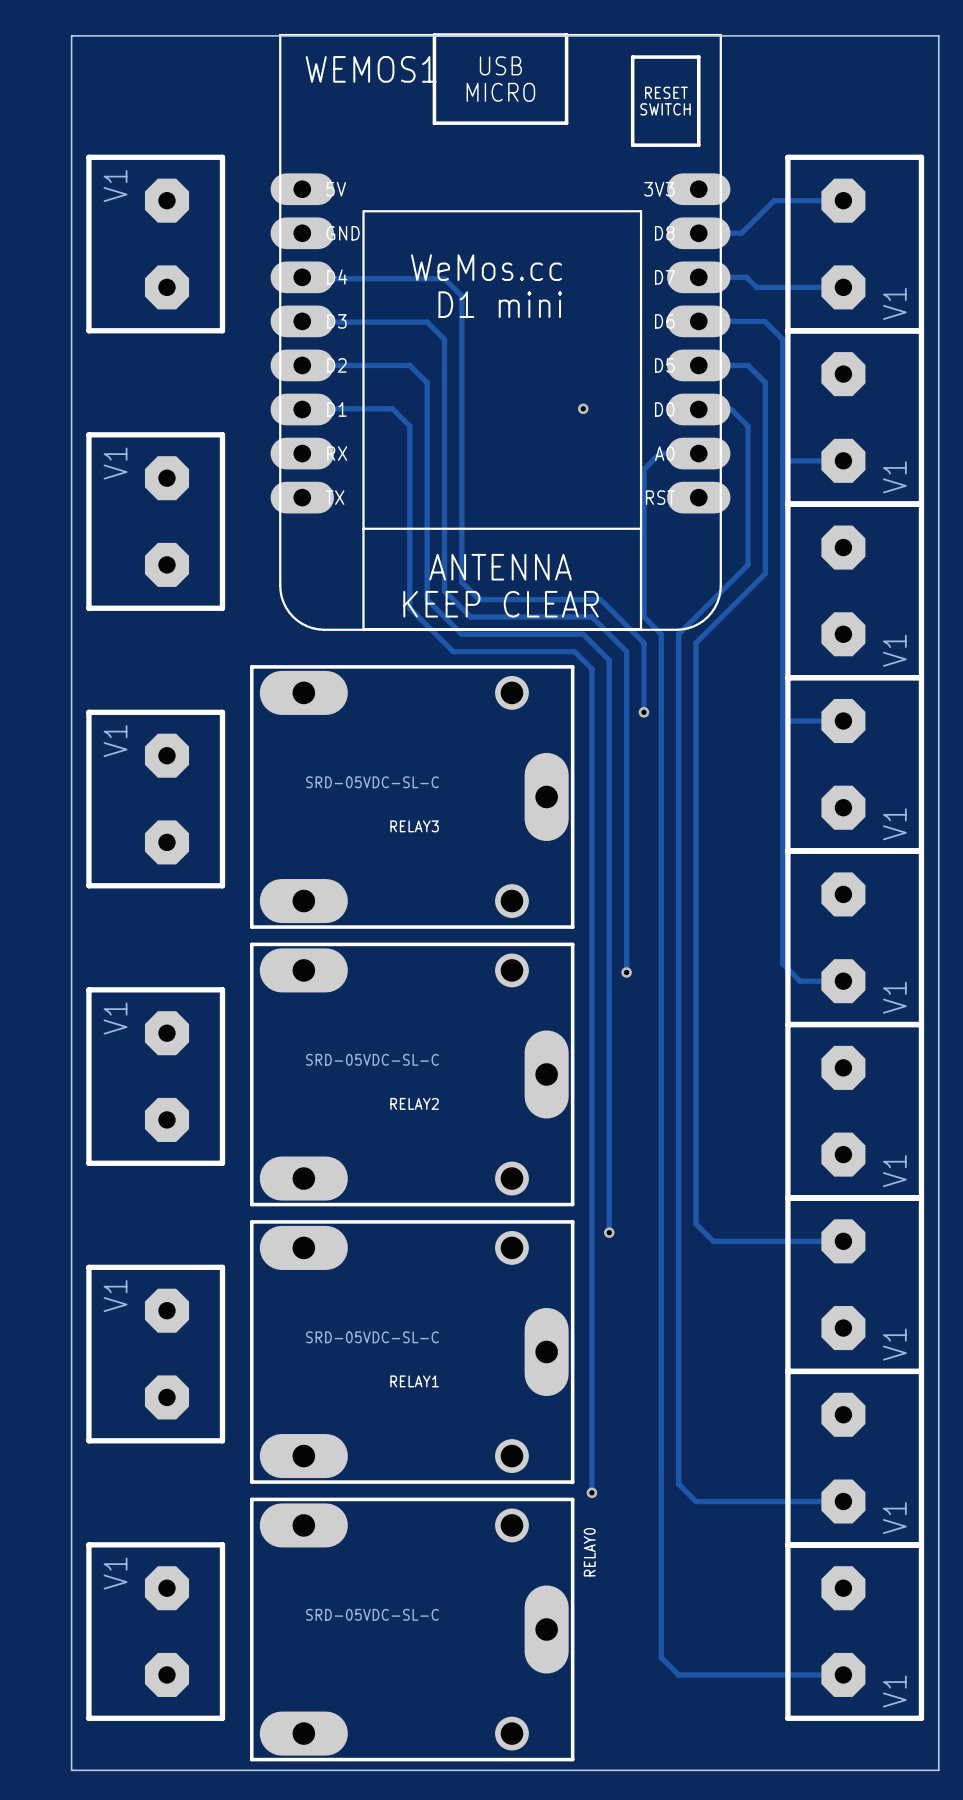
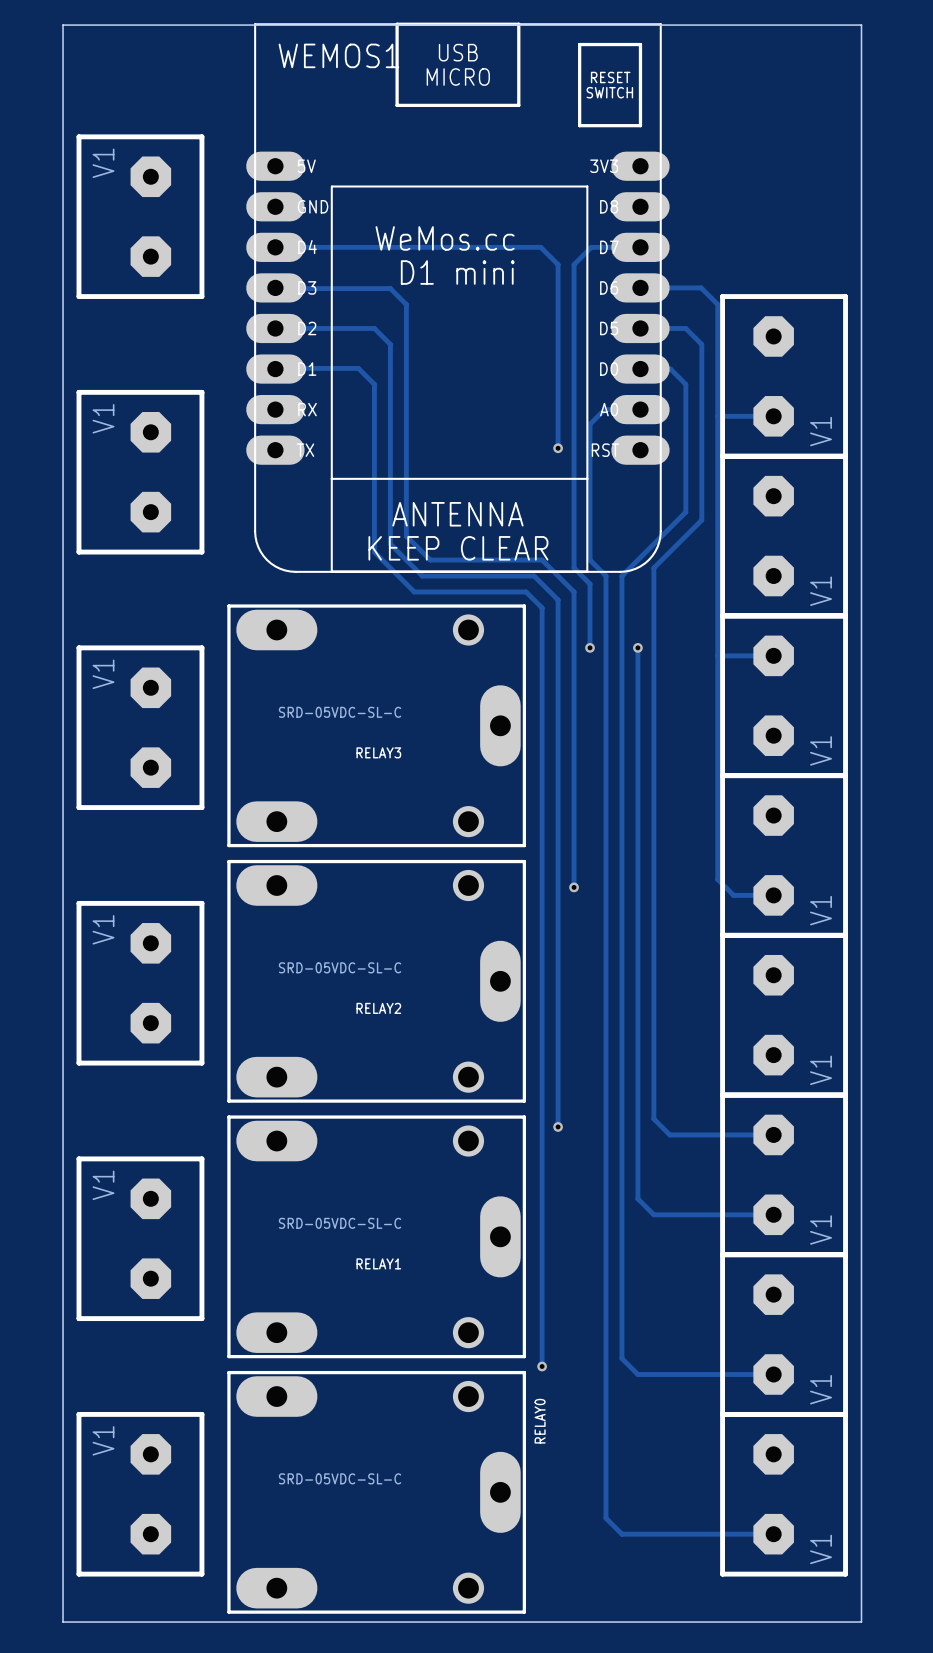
track: (843, 200) (774, 200) (741, 233) (698, 233) -> none
part: V1 (854, 244) -> none
track: (302, 277) (444, 278) (461, 296) (461, 582) (479, 599) (600, 599) (626, 625) -> (275, 247) (540, 247) (558, 264) (558, 448)
track: (698, 277) (746, 277) (756, 287) (843, 287) -> (640, 247) (591, 247) (574, 264) (574, 568)
via position: (583, 408) -> (558, 448)
track: (713, 625) (695, 642) (695, 712) -> (653, 568) (653, 1118) (669, 1134)
via: none -> (637, 647)
track: (695, 1223) (713, 1241) (730, 1241) -> (637, 1118) (637, 1198) (653, 1214) (773, 1214)

